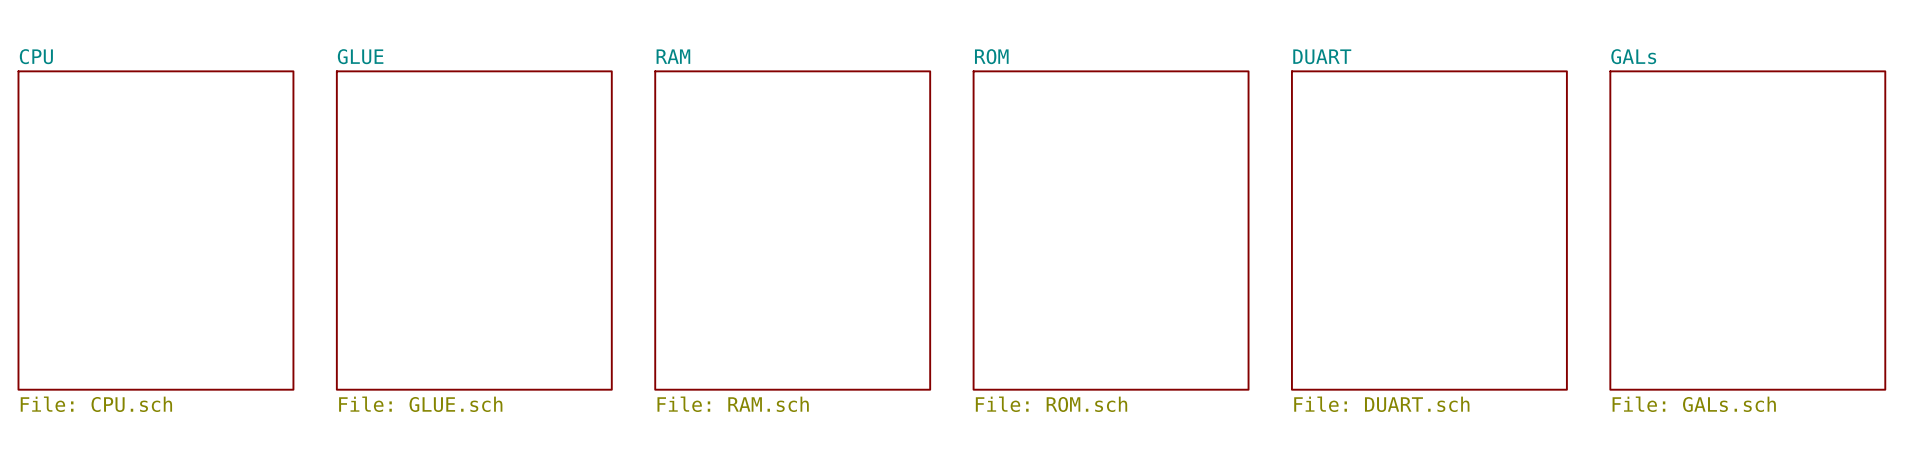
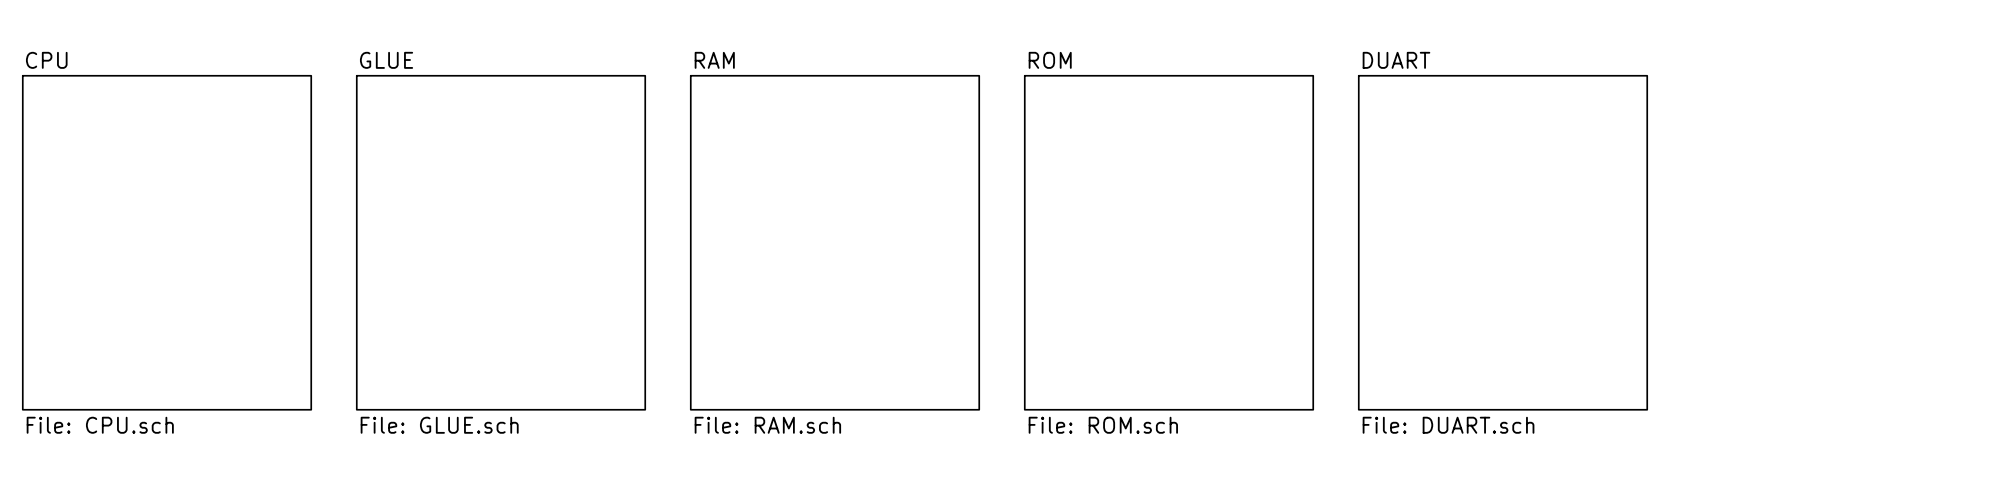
sheet GALs: File: GALs.sch (1747, 230) -> none

